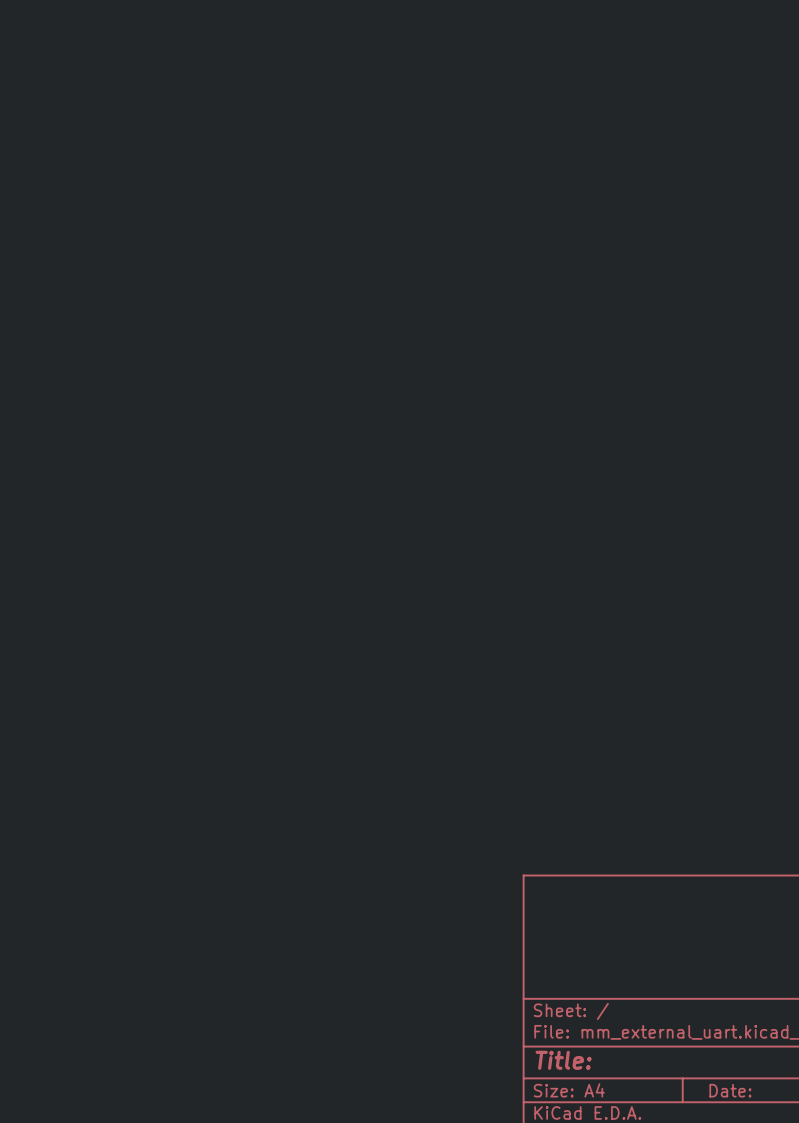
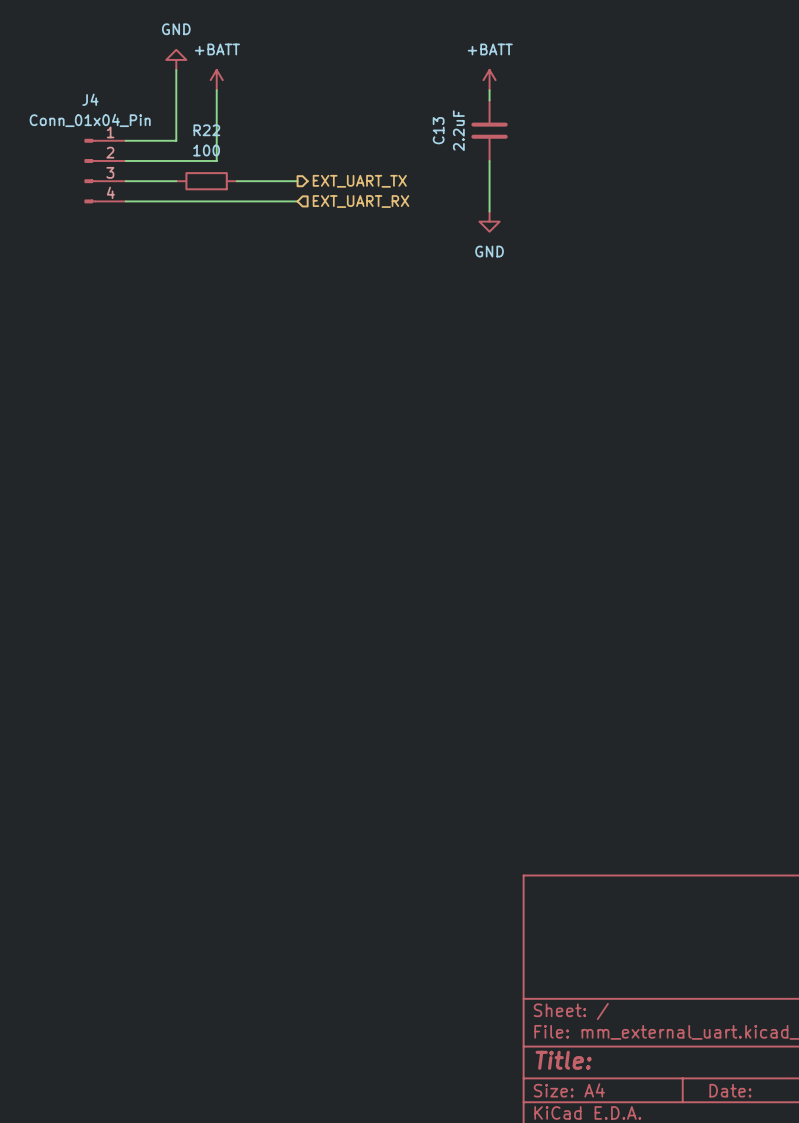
power symbol: none -> GND (176, 59)
wire: none -> (176, 70) (176, 140) (125, 140)
power symbol: none -> +BATT (216, 80)
power symbol: none -> +BATT (489, 80)
wire: none -> (216, 90) (216, 160) (125, 160)
wire: none -> (489, 90) (489, 100)
C13: none -> 2.2uF (489, 130)
wire: none -> (489, 160) (489, 211)
J4: none -> Conn_01x04_Pin (105, 171)
wire: none -> (125, 181) (176, 181)
R22: none -> 100 (206, 181)
wire: none -> (236, 181) (297, 181)
hierarchical label: none -> EXT_UART_TX (359, 181)
wire: none -> (125, 201) (297, 201)
hierarchical label: none -> EXT_UART_RX (360, 201)
power symbol: none -> GND (489, 221)

